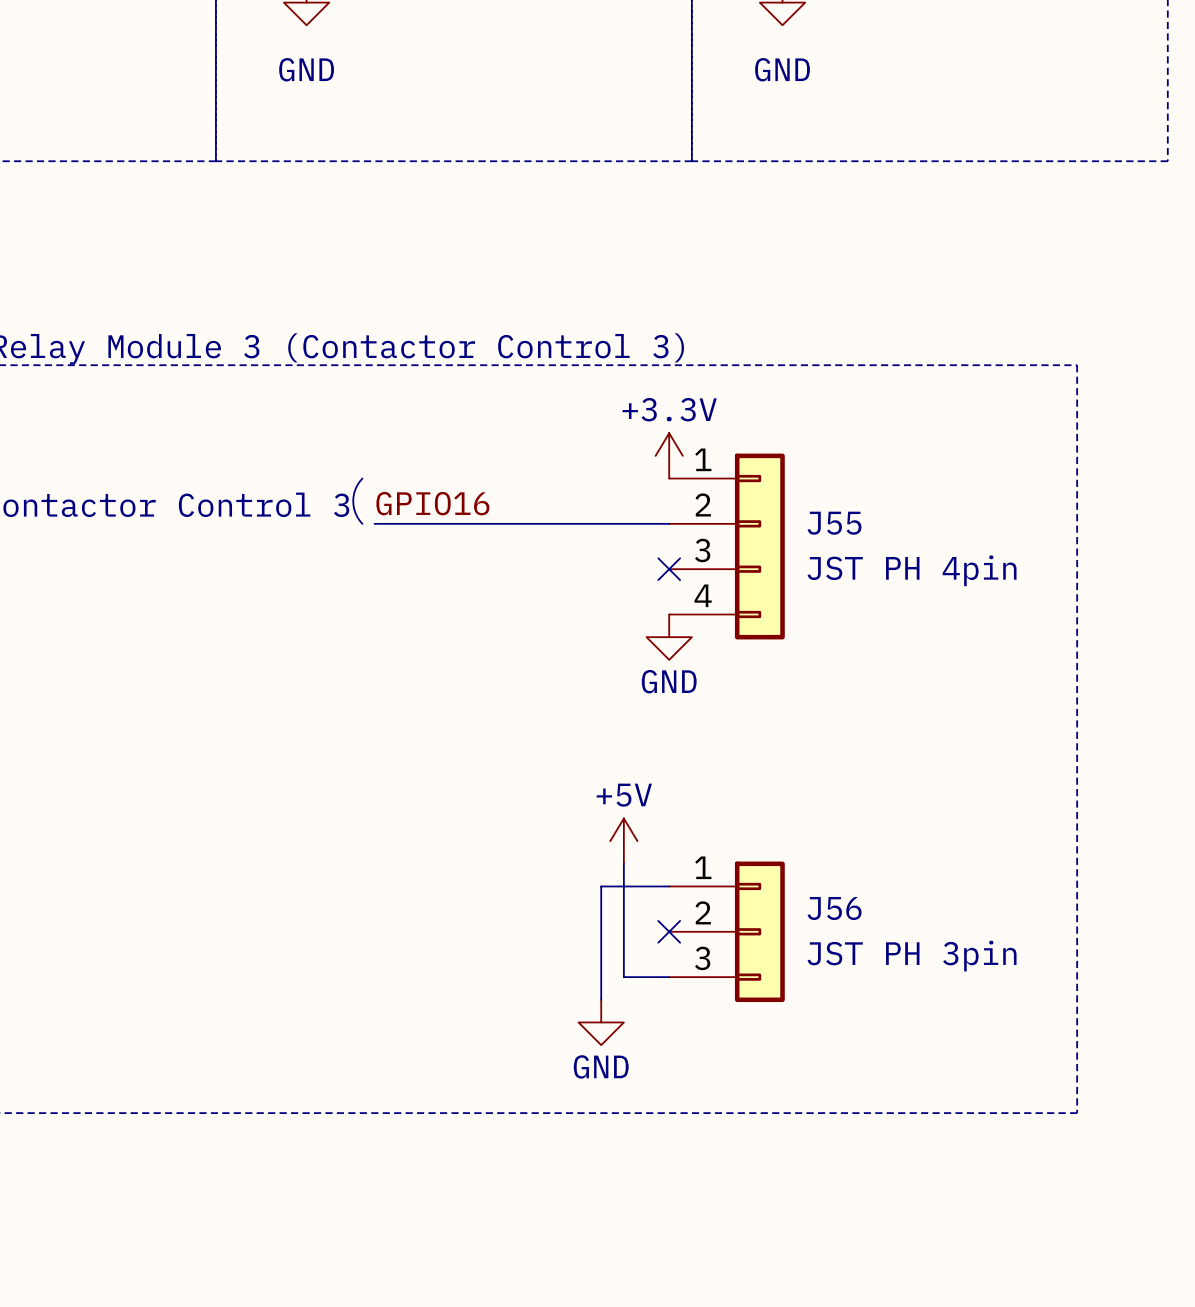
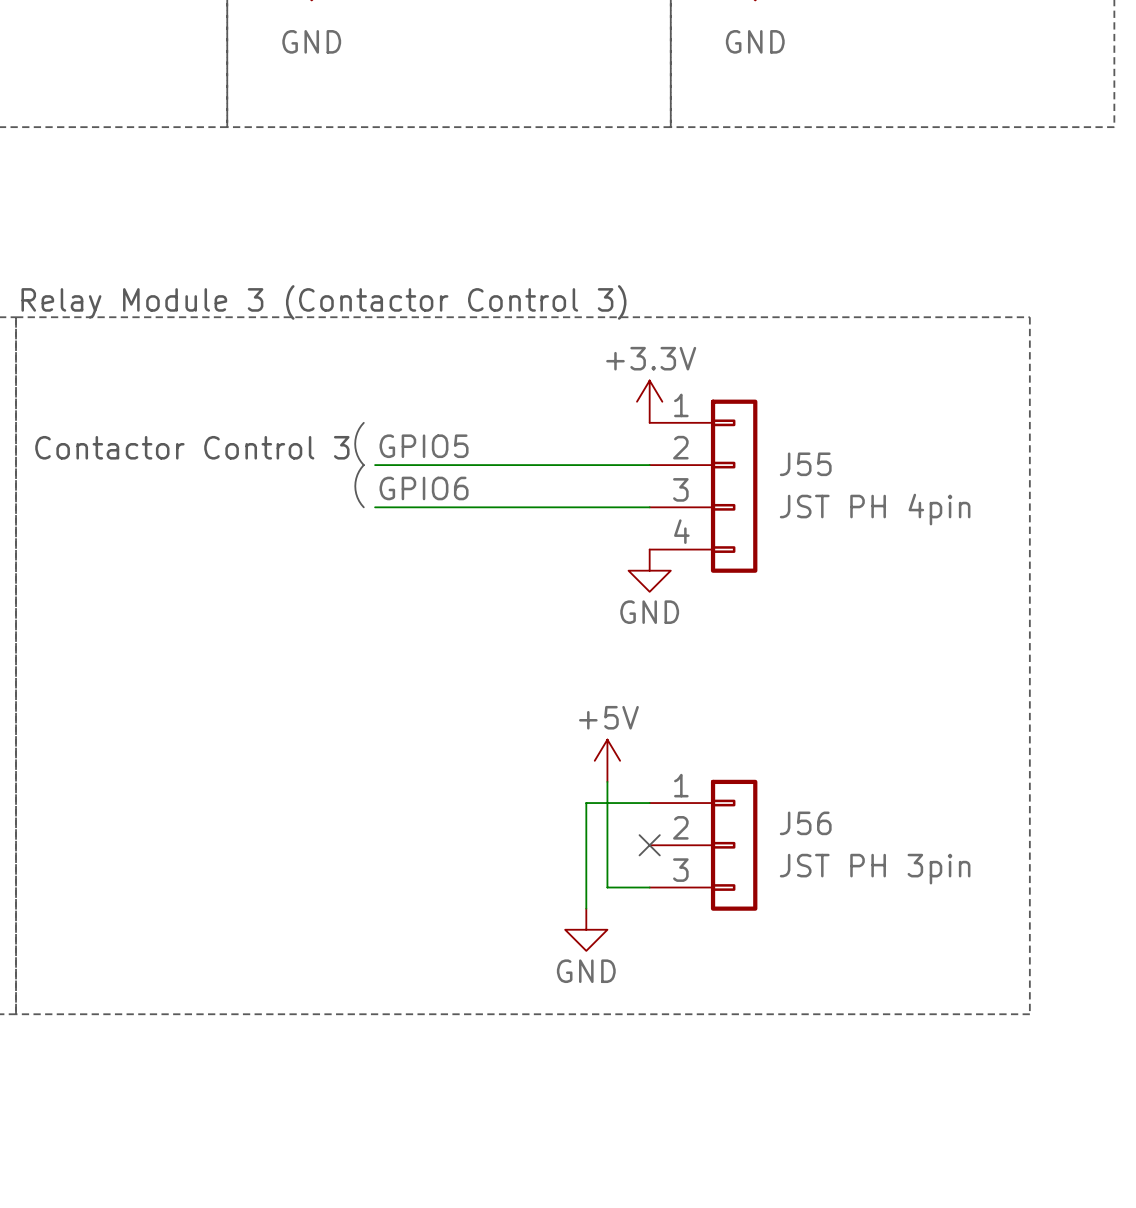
label: GPIO16 (432, 503) -> GPIO5 (424, 446)
line: none -> (363, 465) (357, 474) (355, 486) (357, 497) (363, 507)
label: none -> GPIO6 (424, 488)
wire: none -> (375, 507) (649, 507)
no-connect mark: (669, 569) -> none

